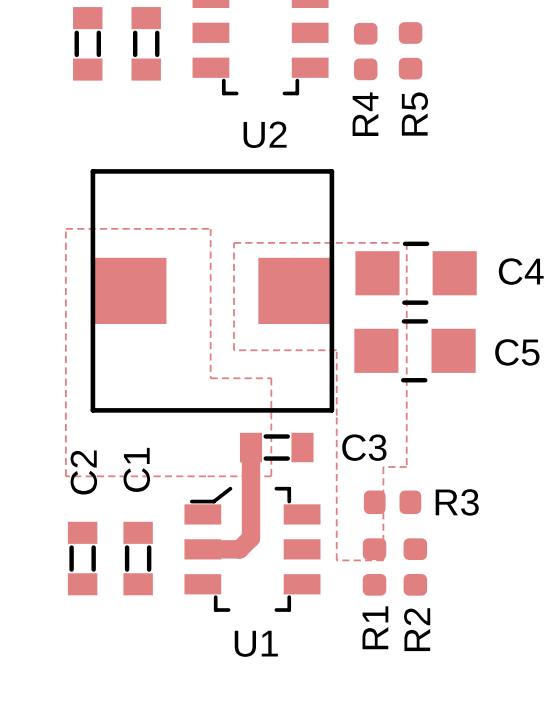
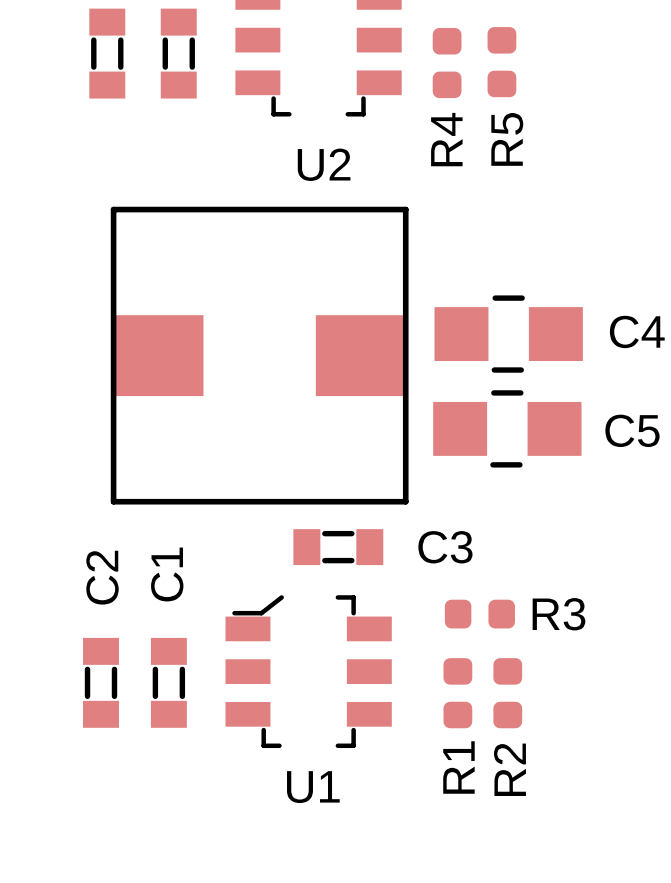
top zone outline: (65, 228) (65, 476) (271, 476) (271, 378) (210, 378) (210, 228) (65, 228) -> none
top zone outline: (233, 242) (233, 350) (336, 350) (336, 560) (383, 560) (383, 467) (406, 467) (406, 242) (233, 242) -> none
top track: (251, 447) (251, 537) (239, 549) (202, 549) -> none

